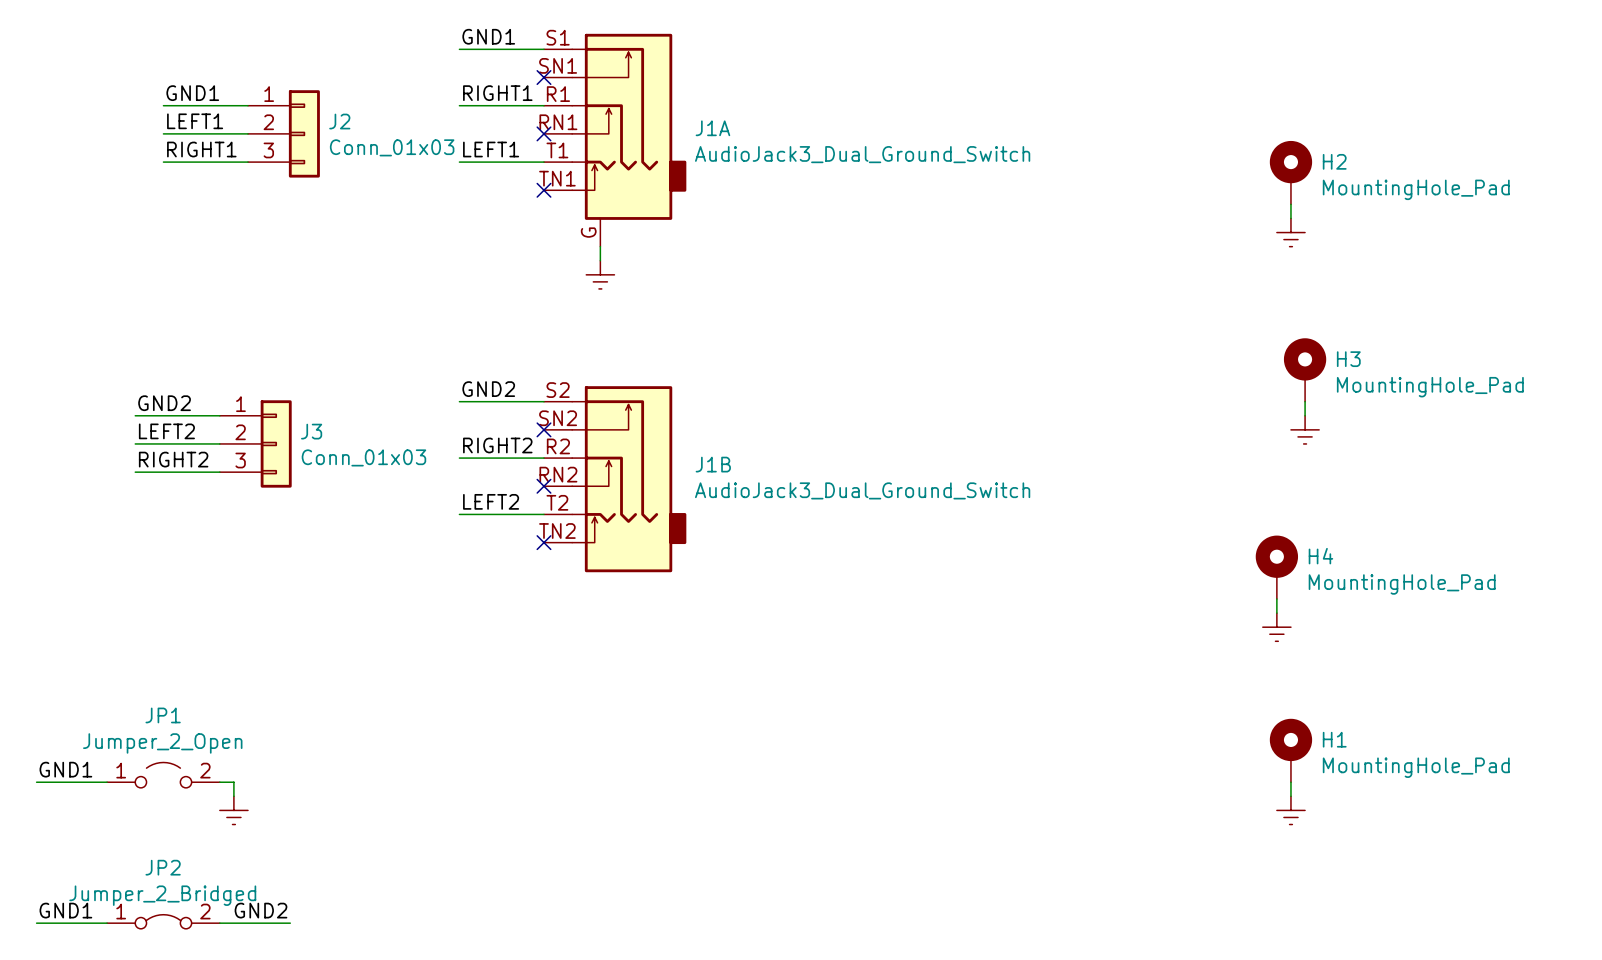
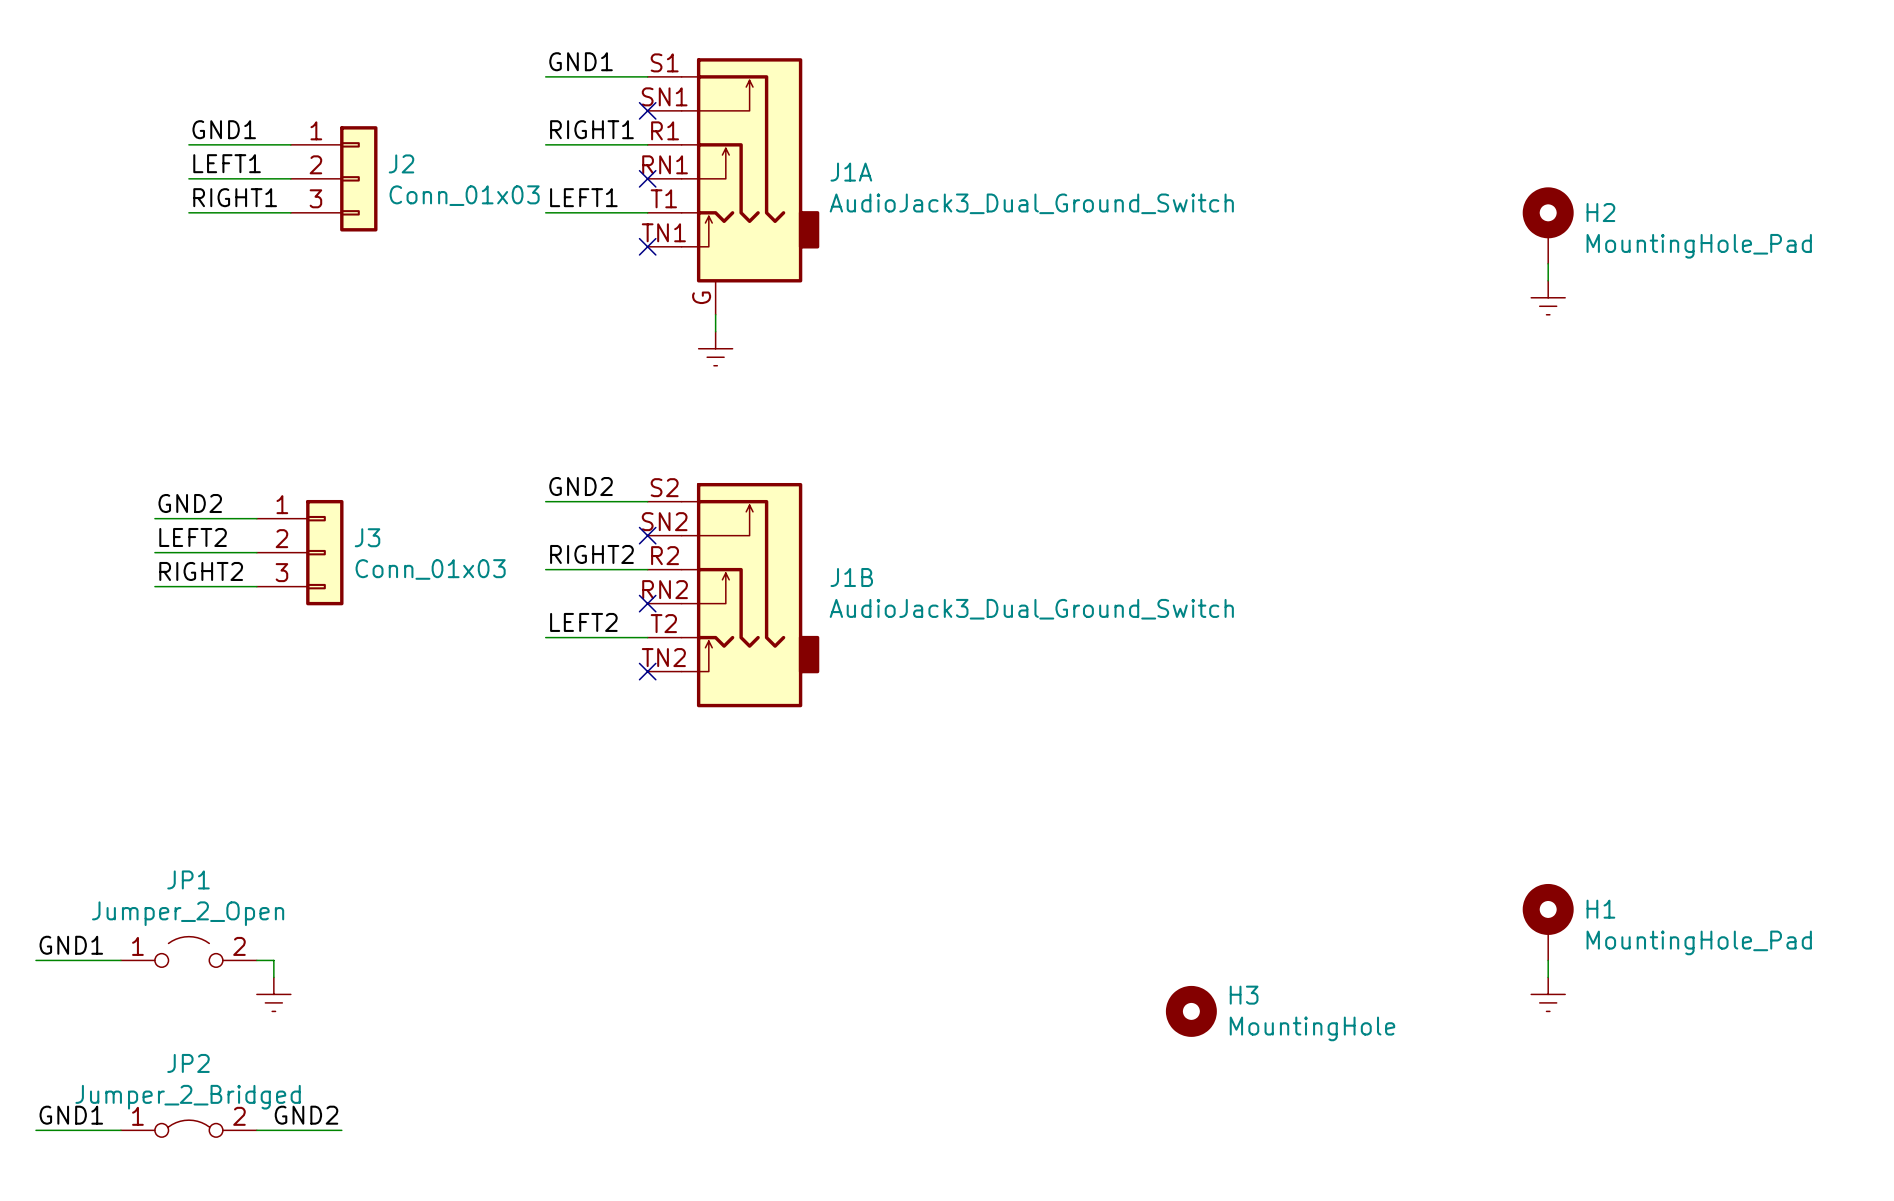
H3 symbol: [1283, 338, 1327, 402] -> [1165, 985, 1217, 1037]
H3 value: MountingHole_Pad (1430, 387) -> MountingHole (1312, 1028)
wire: (1305, 401) (1305, 415) -> none
power symbol: (1305, 429) -> none
H4: MountingHole_Pad (1276, 567) -> none
wire: (1276, 599) (1276, 613) -> none
power symbol: (1276, 627) -> none

